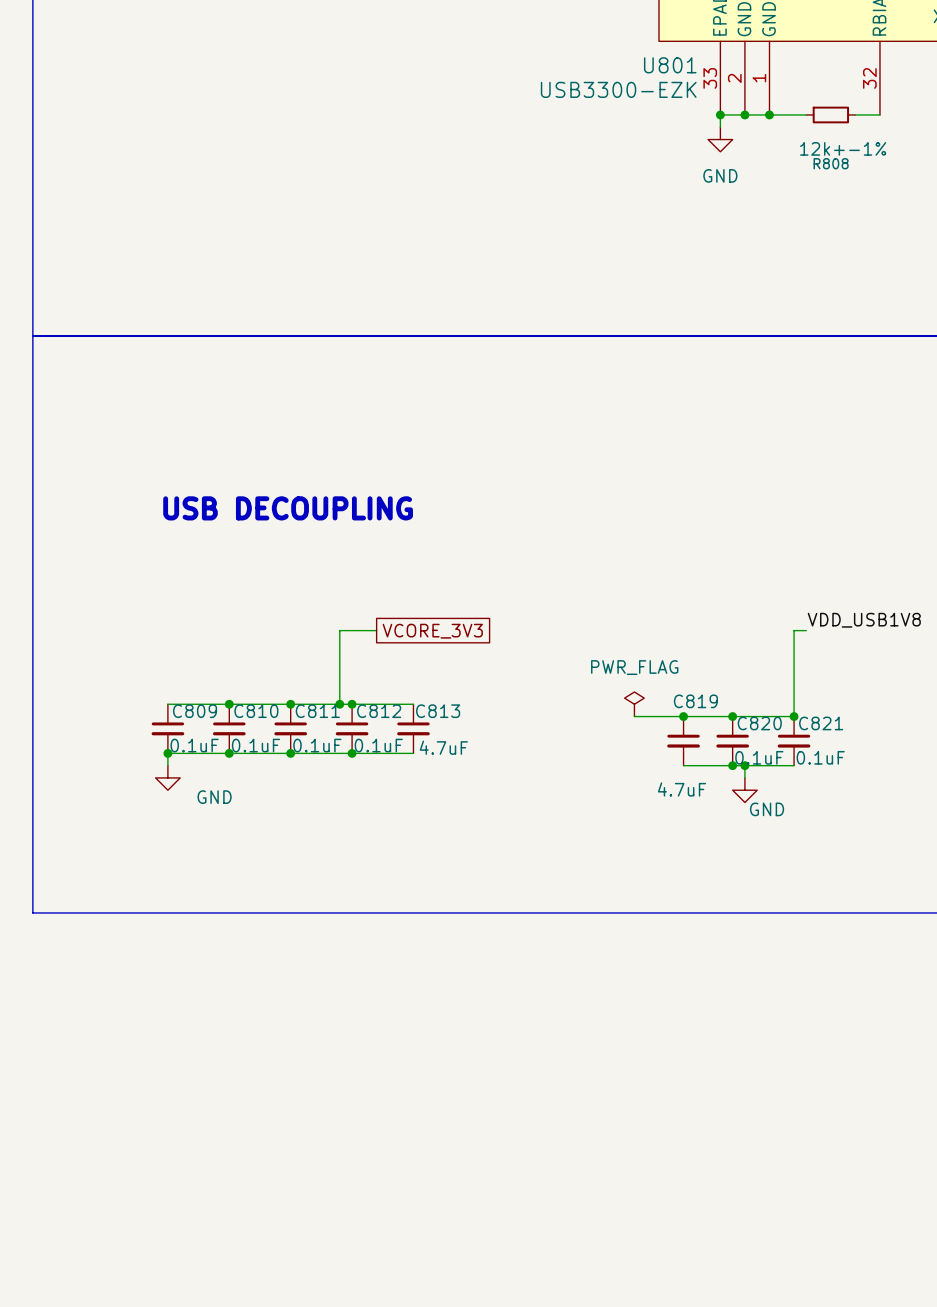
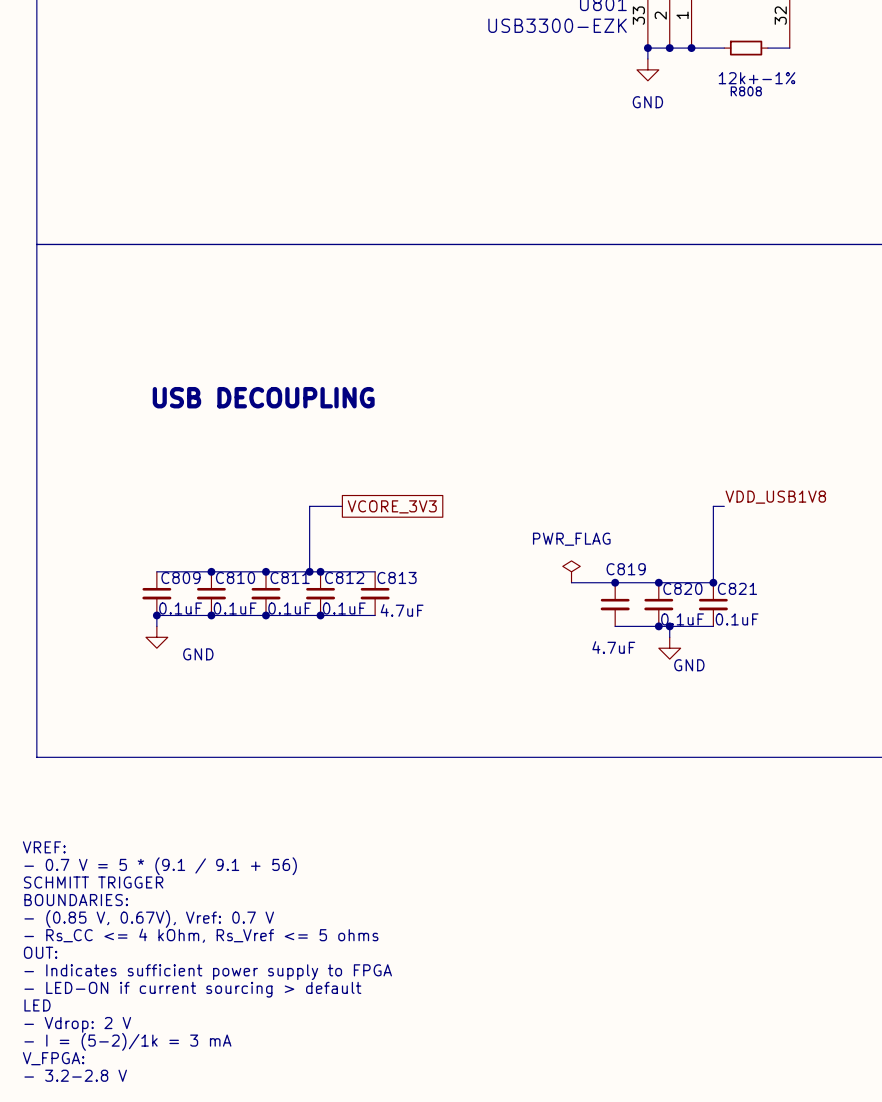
text: none -> VREF: (44, 847)
text: none -> - 0.7 V = 5 * (9.1 / 9.1 + 56) (160, 866)
text: none -> SCHMITT TRIGGER (93, 882)
text: none -> BOUNDARIES: (76, 900)
text: none -> - (0.85 V, 0.67V), Vref: 0.7 V (149, 918)
text: none -> - Rs_CC <= 4 kOhm, Rs_Vref <= 5 ohms (201, 935)
text: none -> OUT: (40, 952)
text: none -> - Indicates sufficient power supply to FPGA (208, 972)
text: none -> - LED-ON if current sourcing > default (192, 989)
text: none -> LED (37, 1005)
text: none -> - Vdrop: 2 V (77, 1024)
text: none -> - I = (5-2)/1k = 3 mA (127, 1041)
text: none -> V_FPGA: (53, 1058)
text: none -> - 3.2-2.8 V (75, 1075)

